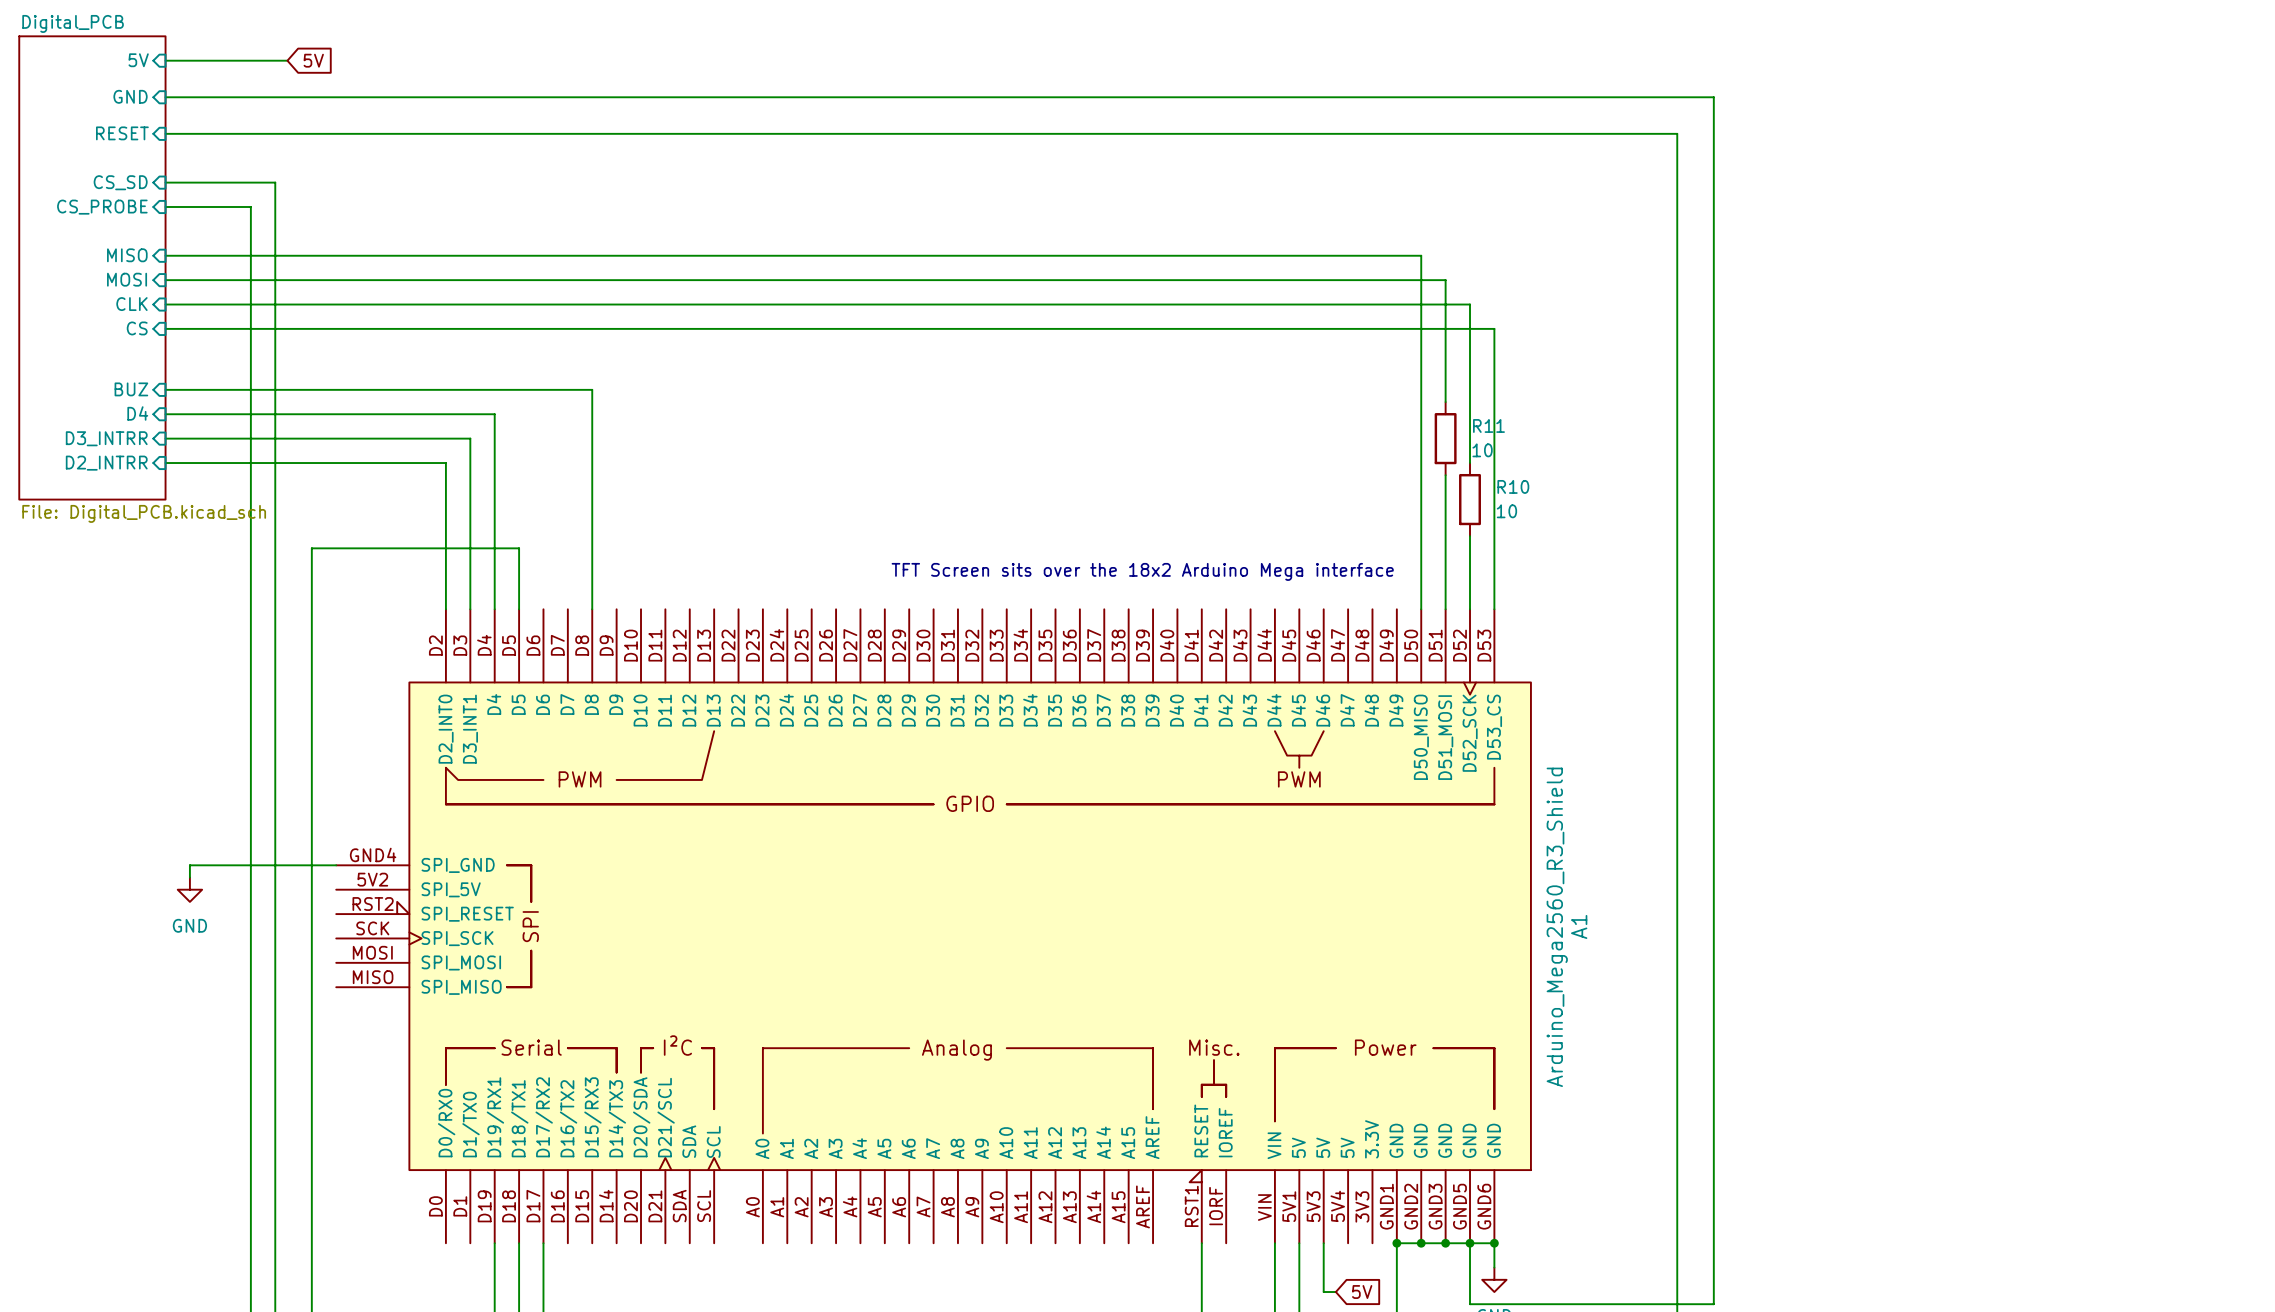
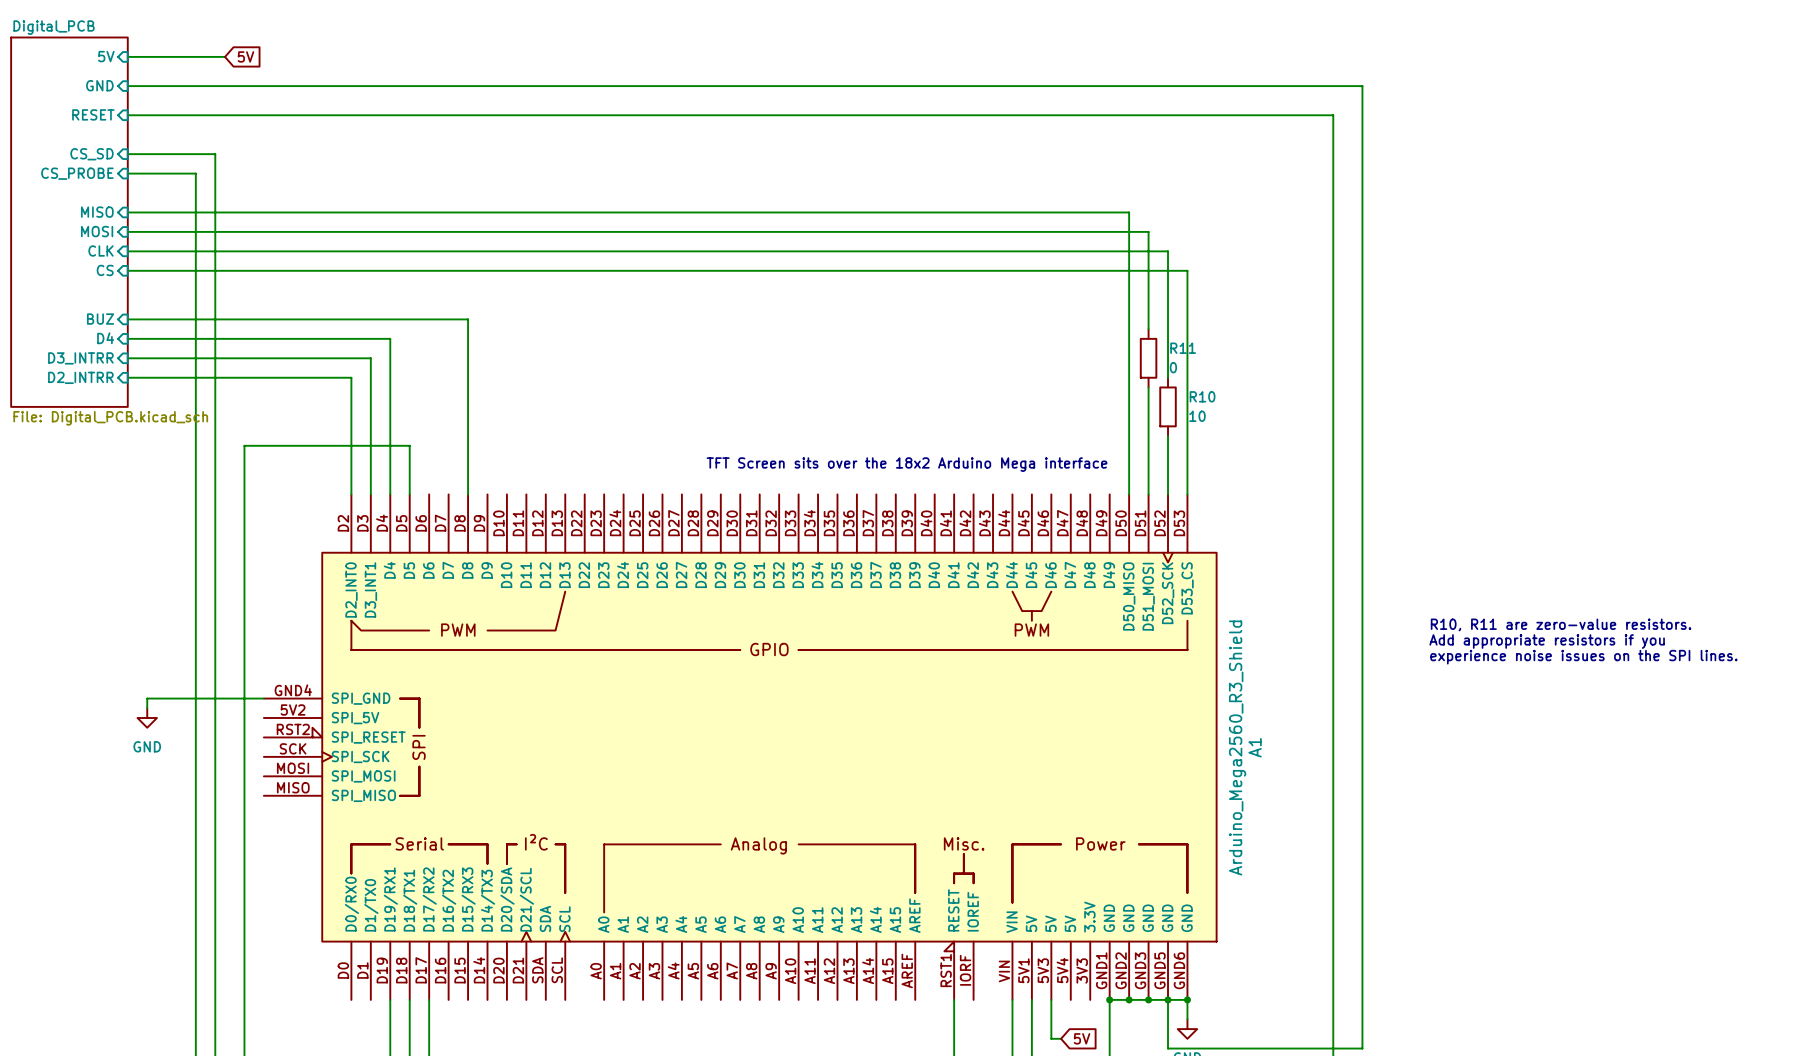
R11 value: 10 (1482, 450) -> 0 (1173, 367)
text: none -> R10, R11 are zero-value resistors. (1561, 624)
text: none -> Add appropriate resistors if you (1547, 641)
text: none -> experience noise issues on the SPI lines. (1583, 657)

